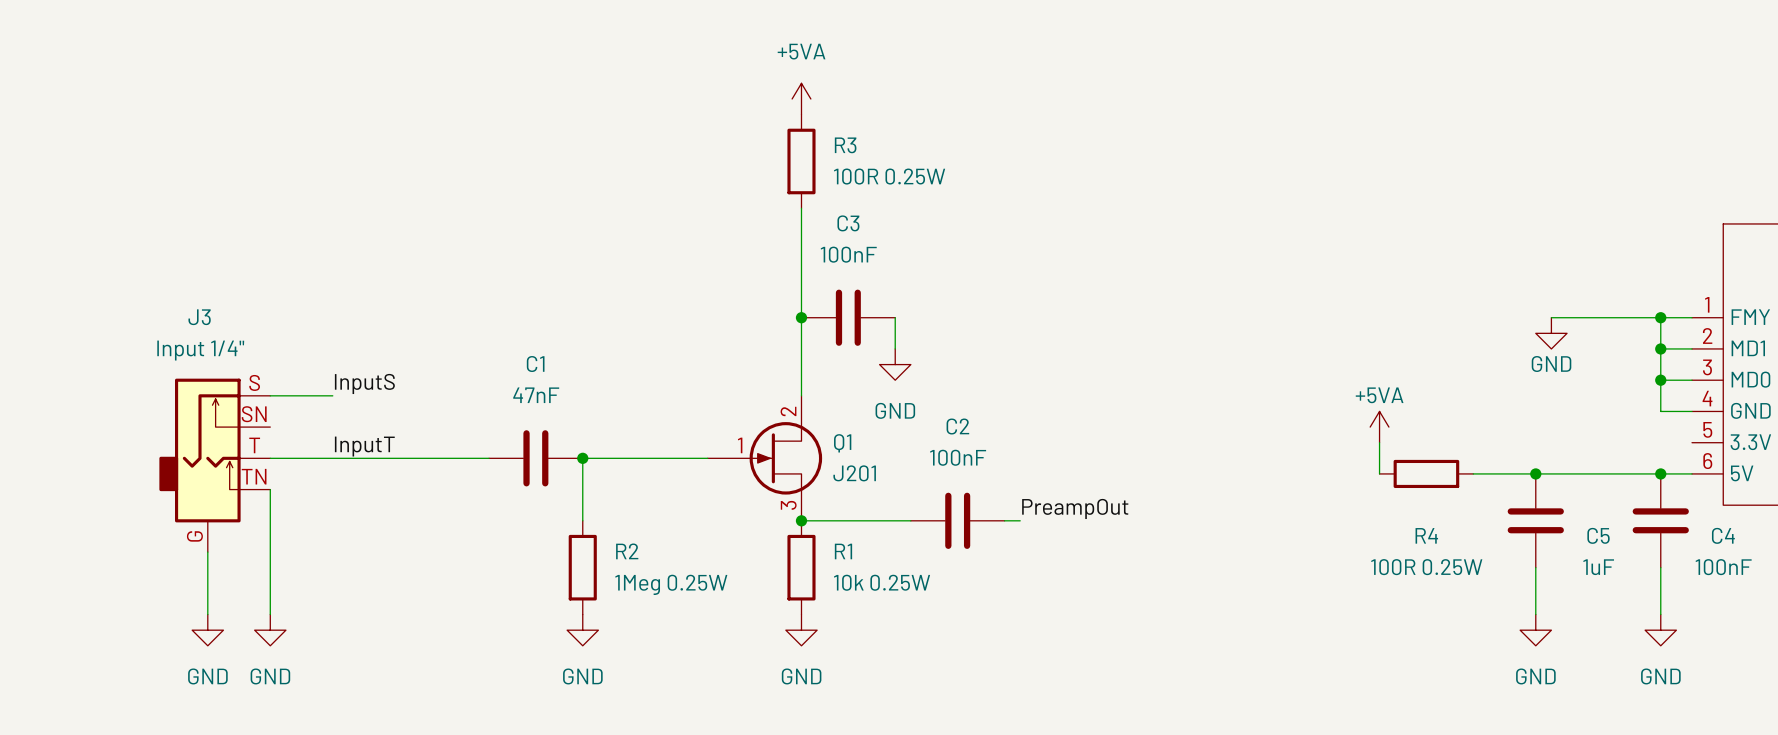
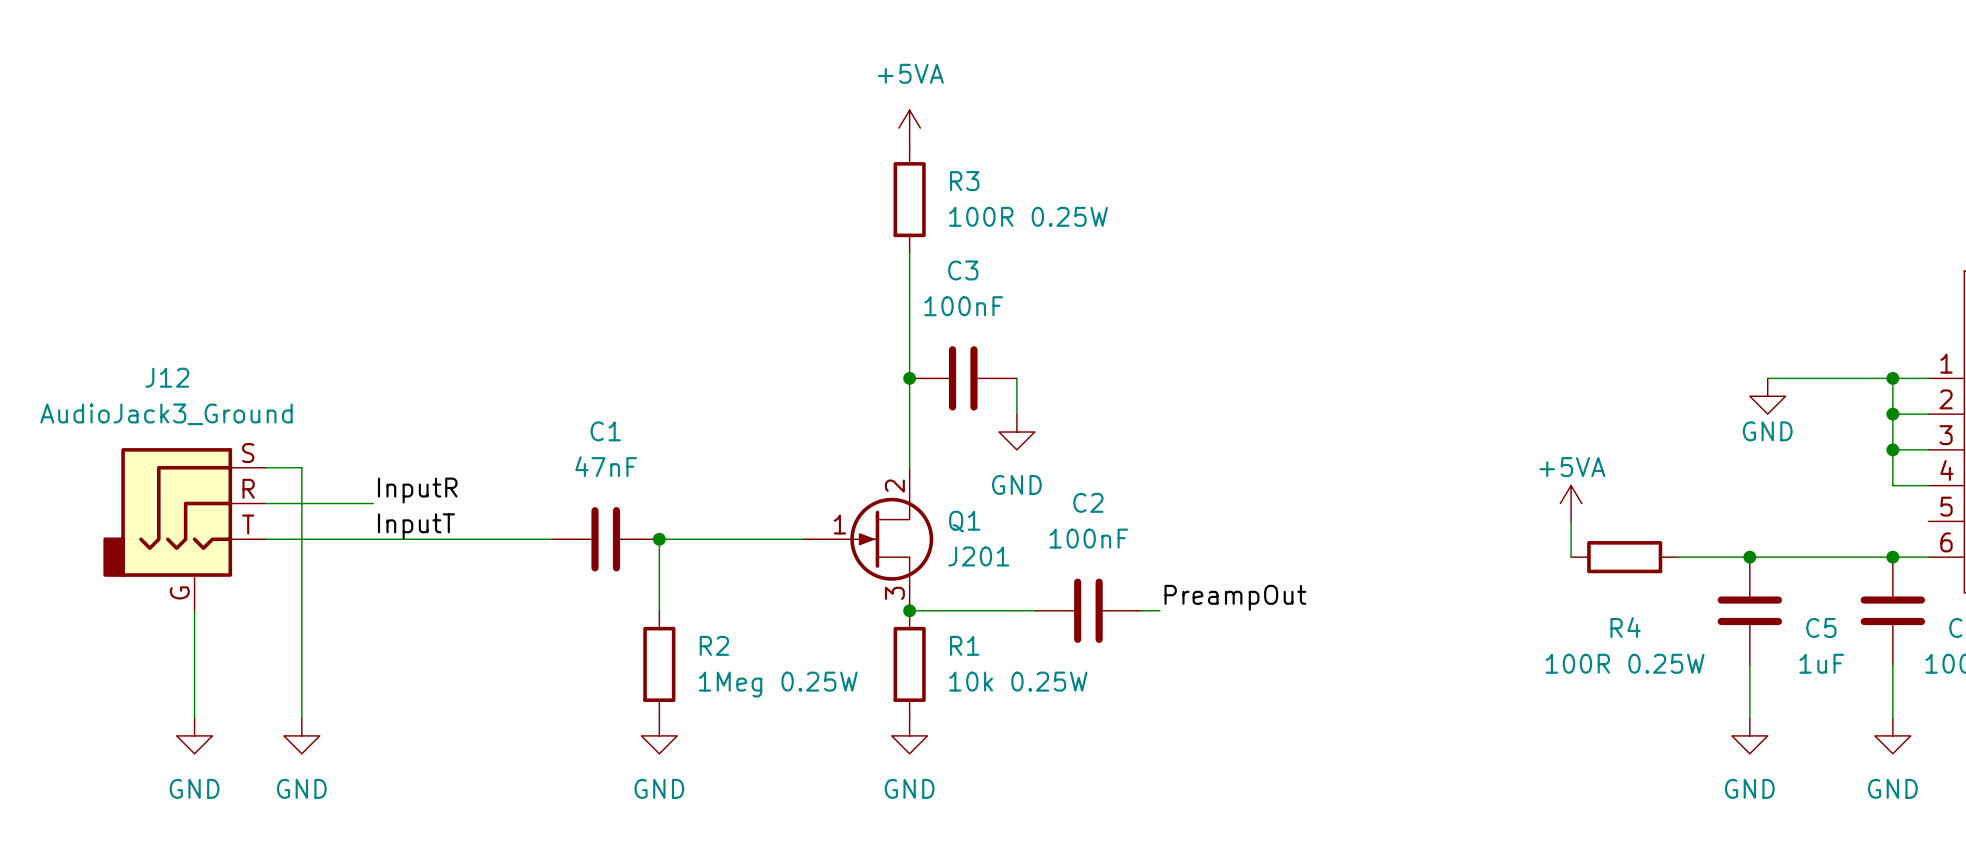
label: InputS (364, 383) -> InputR (417, 490)
wire: none -> (266, 467) (301, 467) (301, 575)
wire: (270, 395) (332, 395) -> none
wire: none -> (266, 503) (373, 503)
J12: none -> AudioJack3_Ground (184, 529)
J3: Input 1/4" (214, 465) -> none
wire: none -> (194, 610) (194, 718)
wire: (207, 552) (207, 614) -> none
power symbol position: GND (207, 630) -> GND (194, 735)

